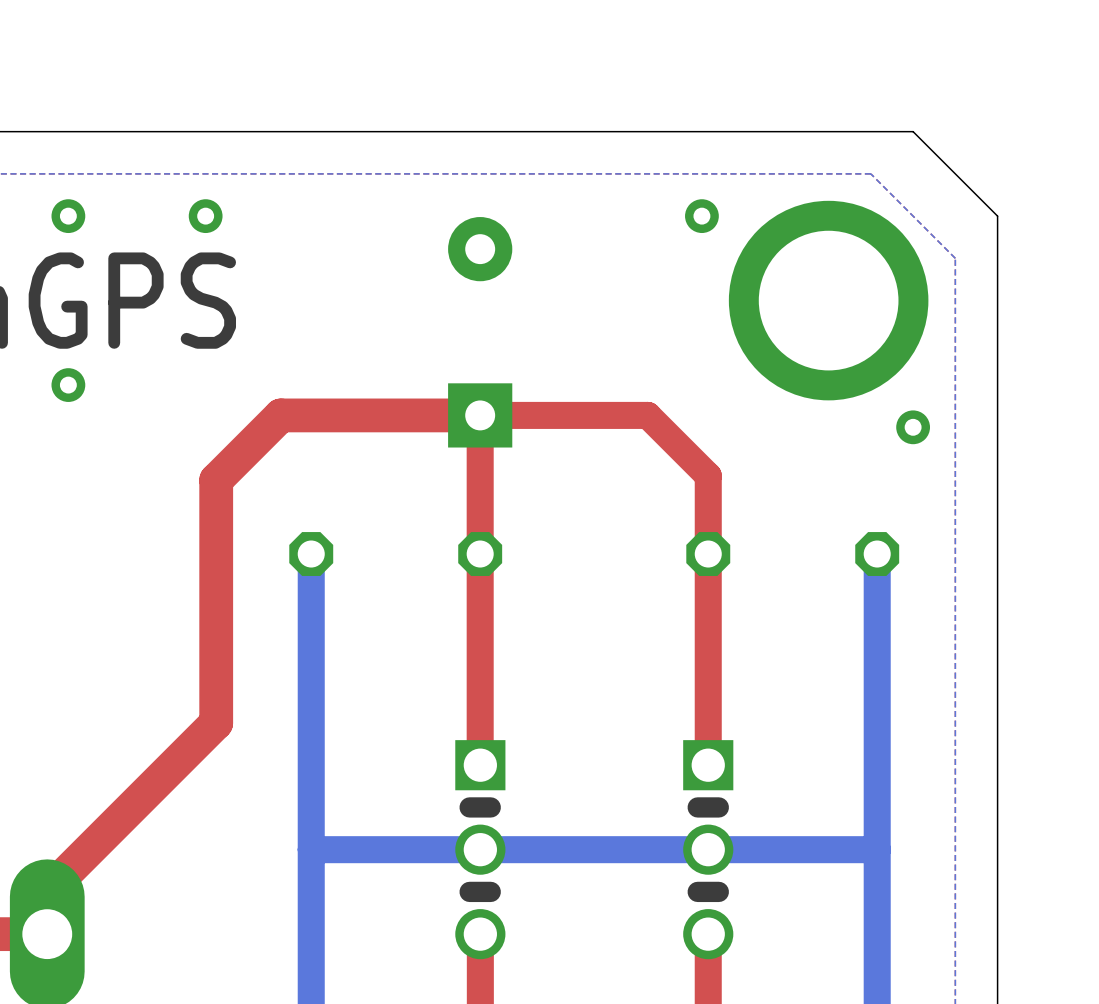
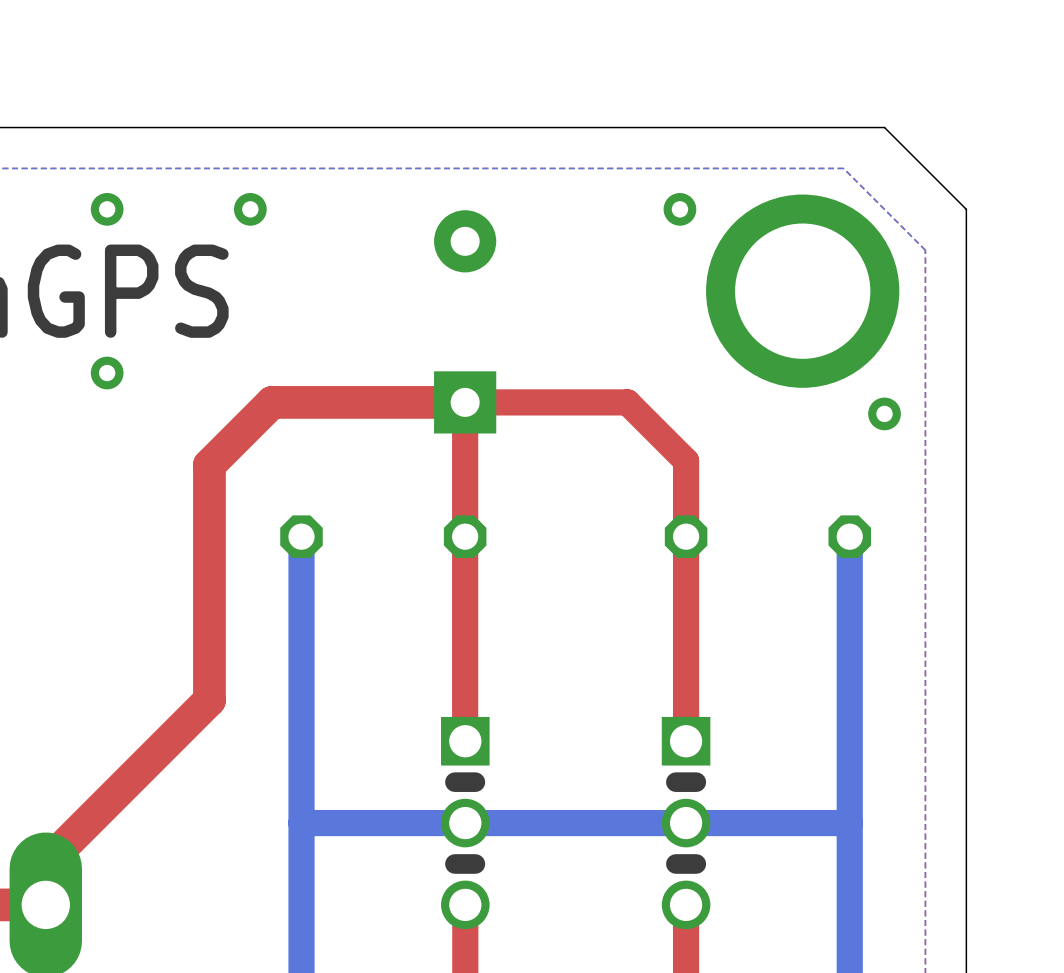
via position: (68, 216) -> (107, 209)
via: (205, 216) -> none
via: none -> (250, 209)
via position: (68, 385) -> (107, 373)

